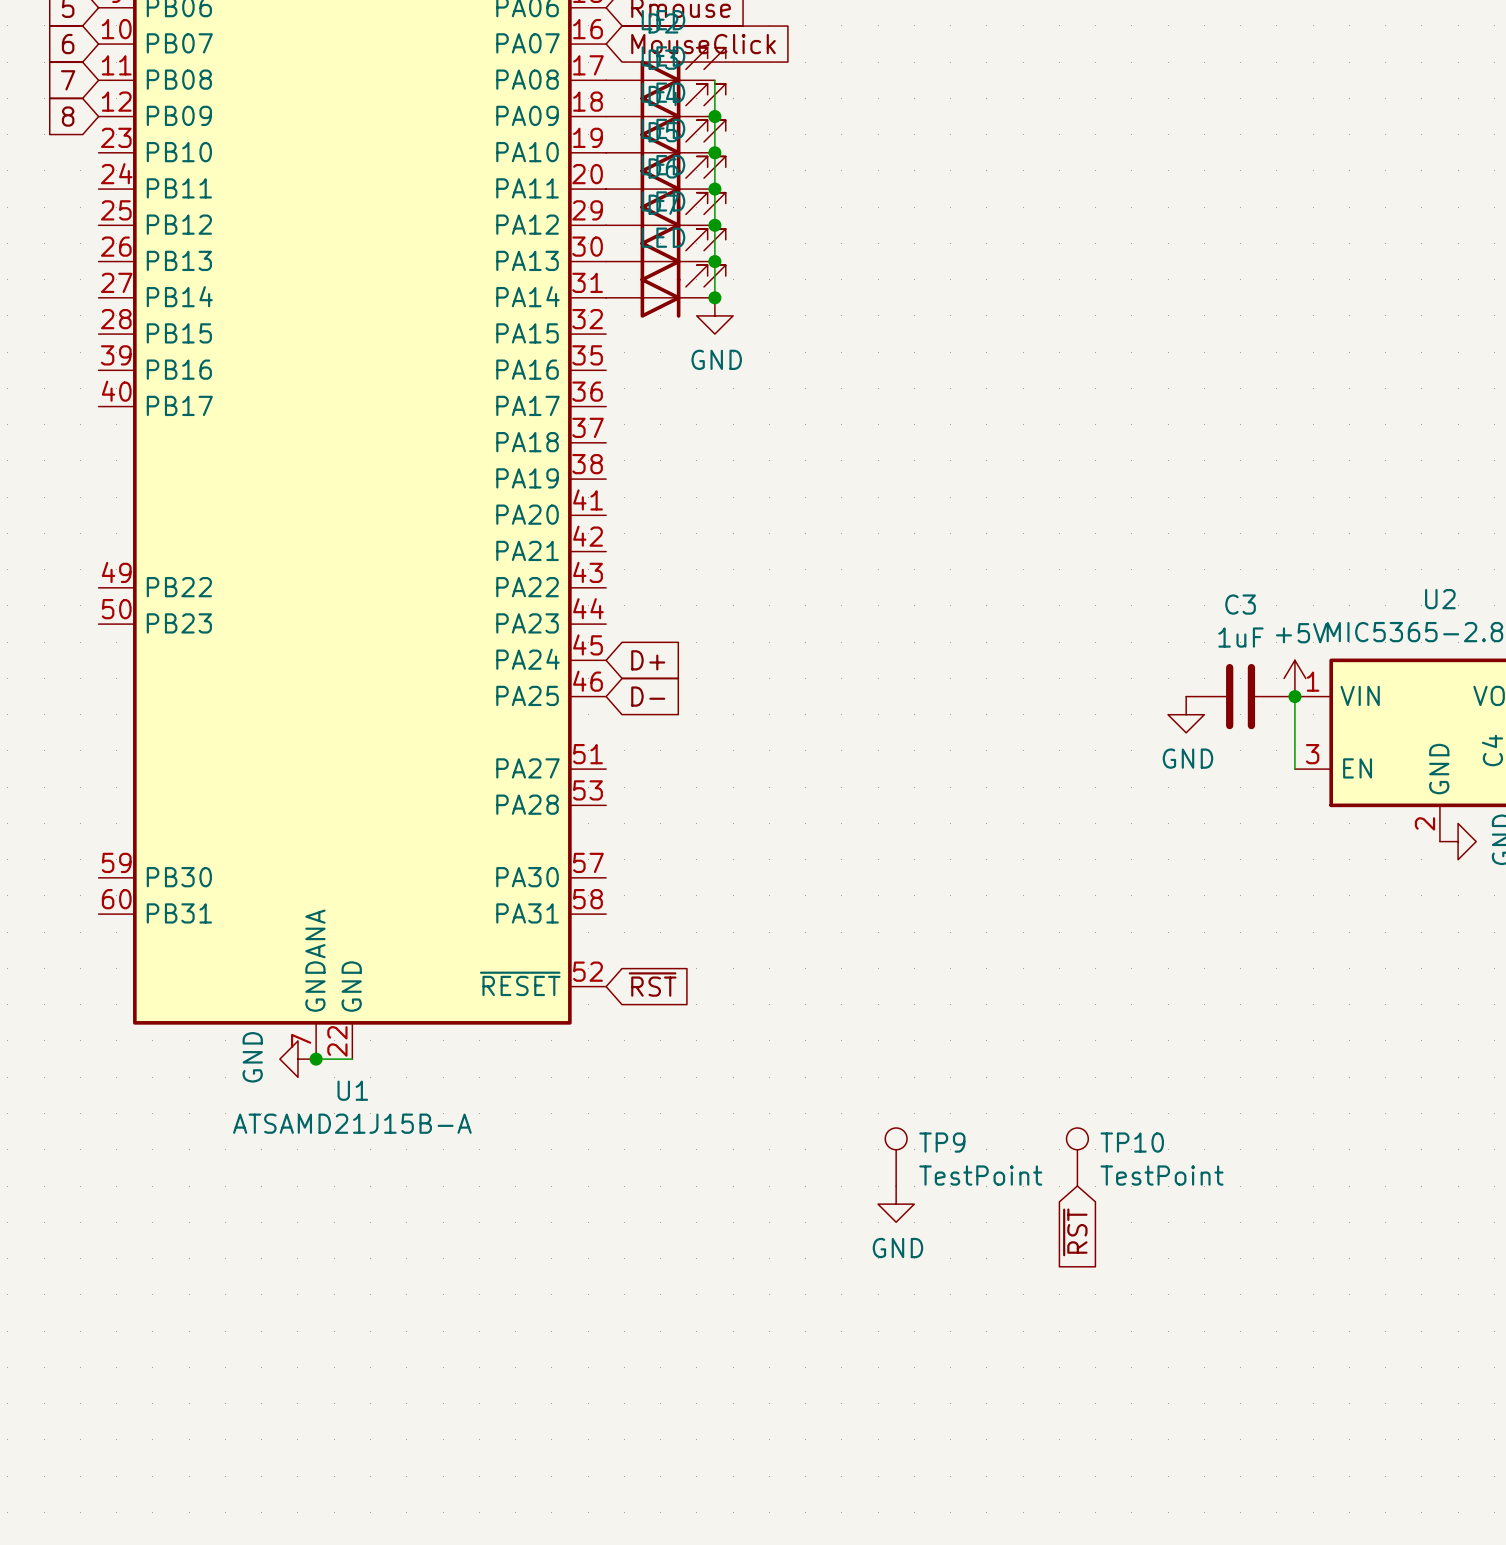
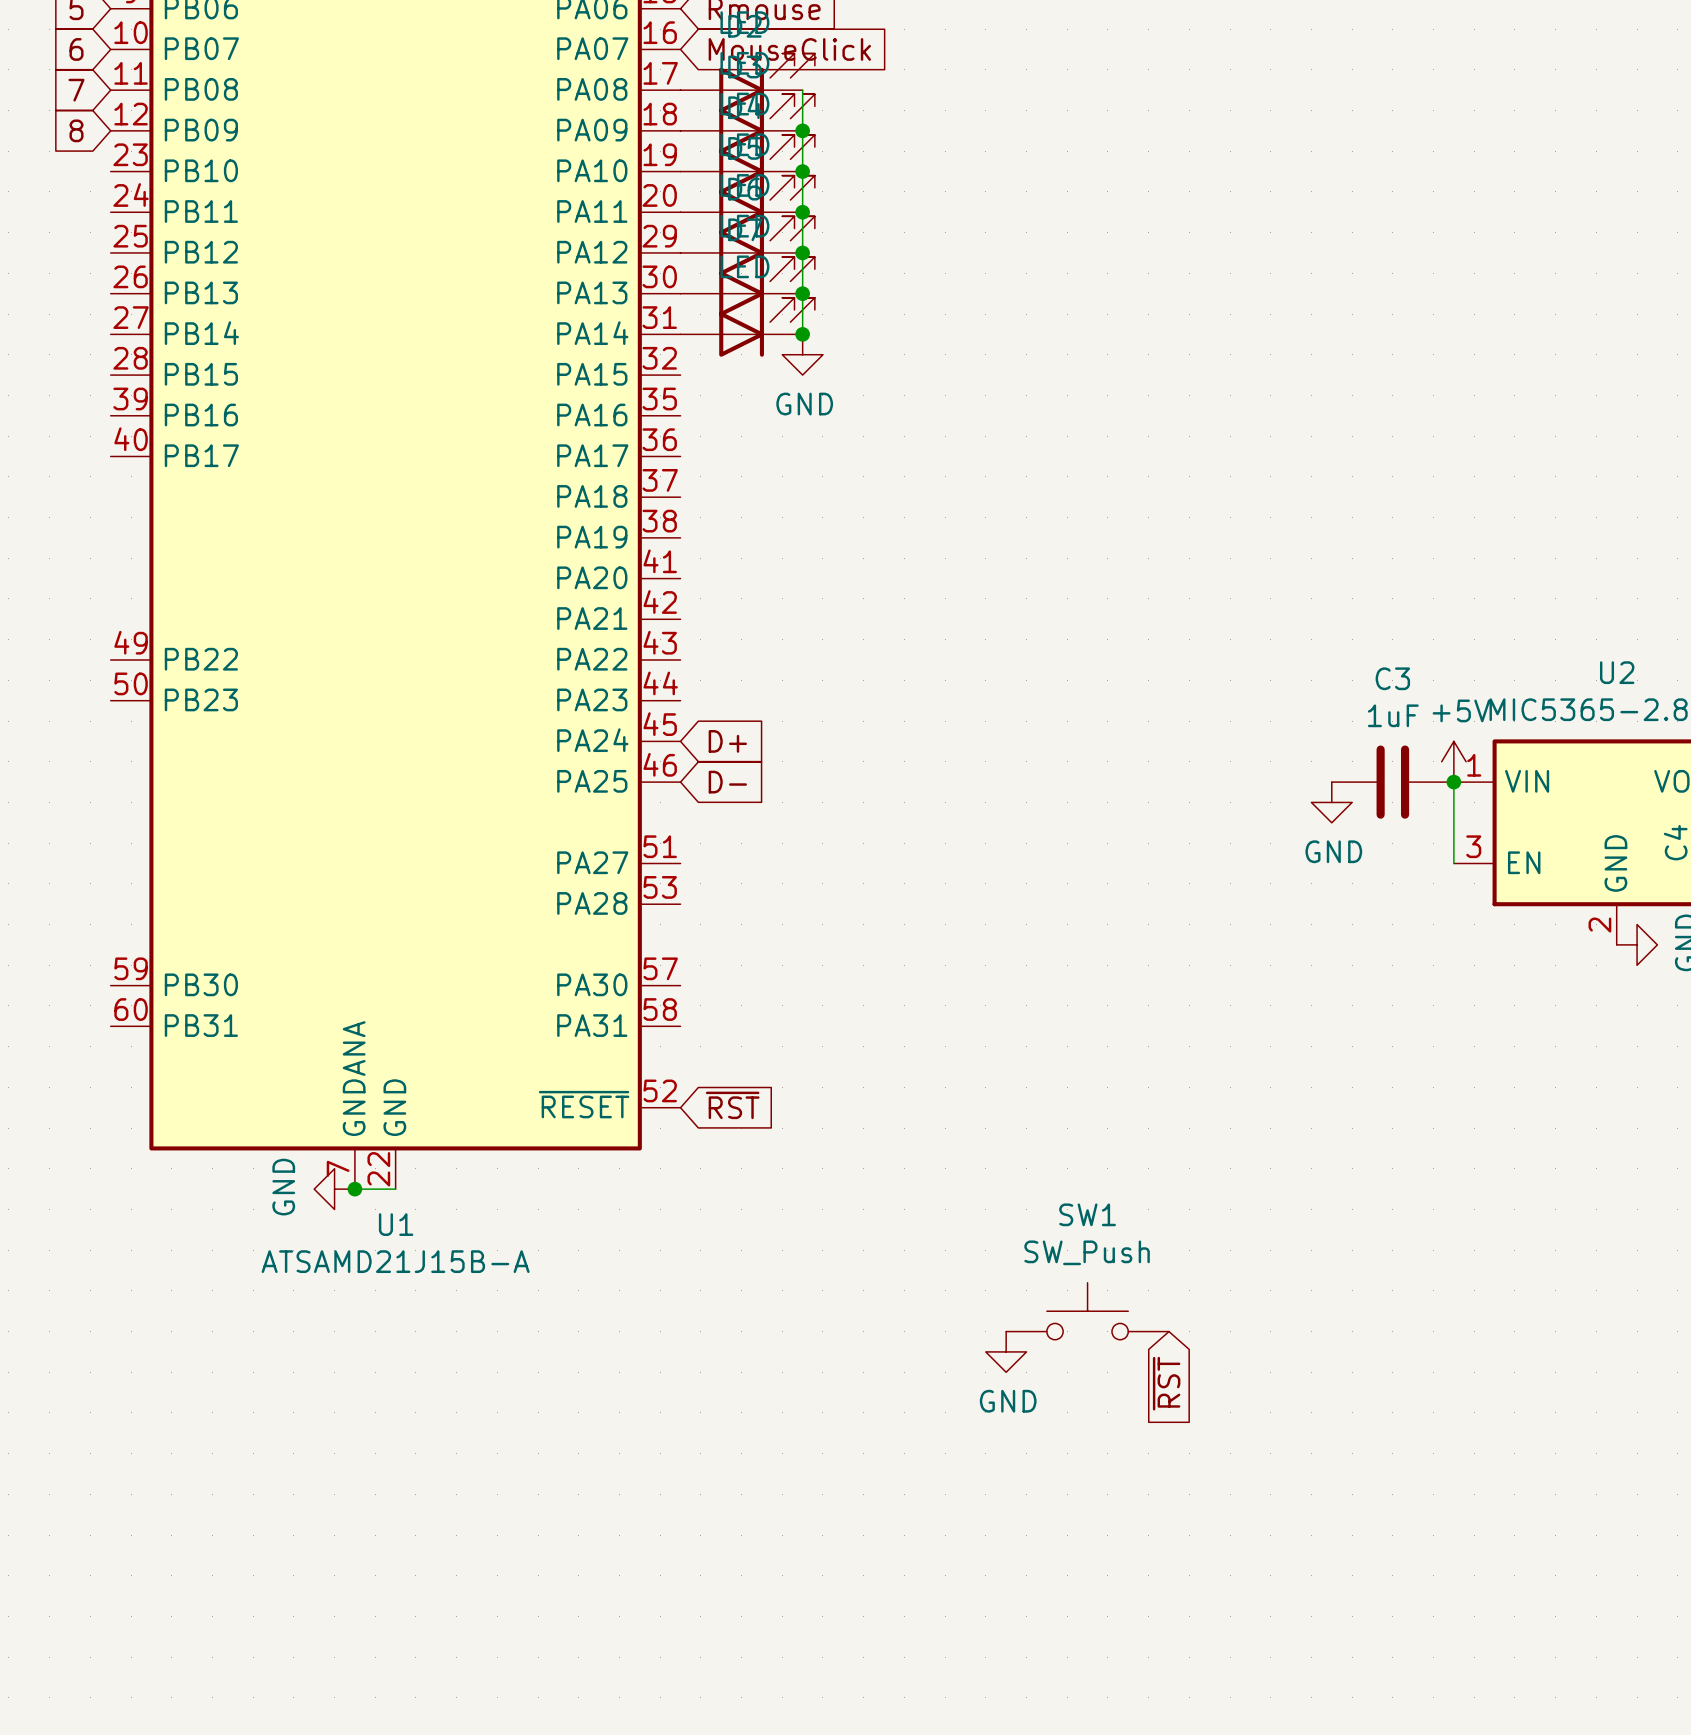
TP9: TestPoint (896, 1157) -> none
TP10: TestPoint (1077, 1157) -> none
SW1: none -> SW_Push (1087, 1311)
global label position: ~{RST} (1075, 1232) -> ~{RST} (1166, 1383)

